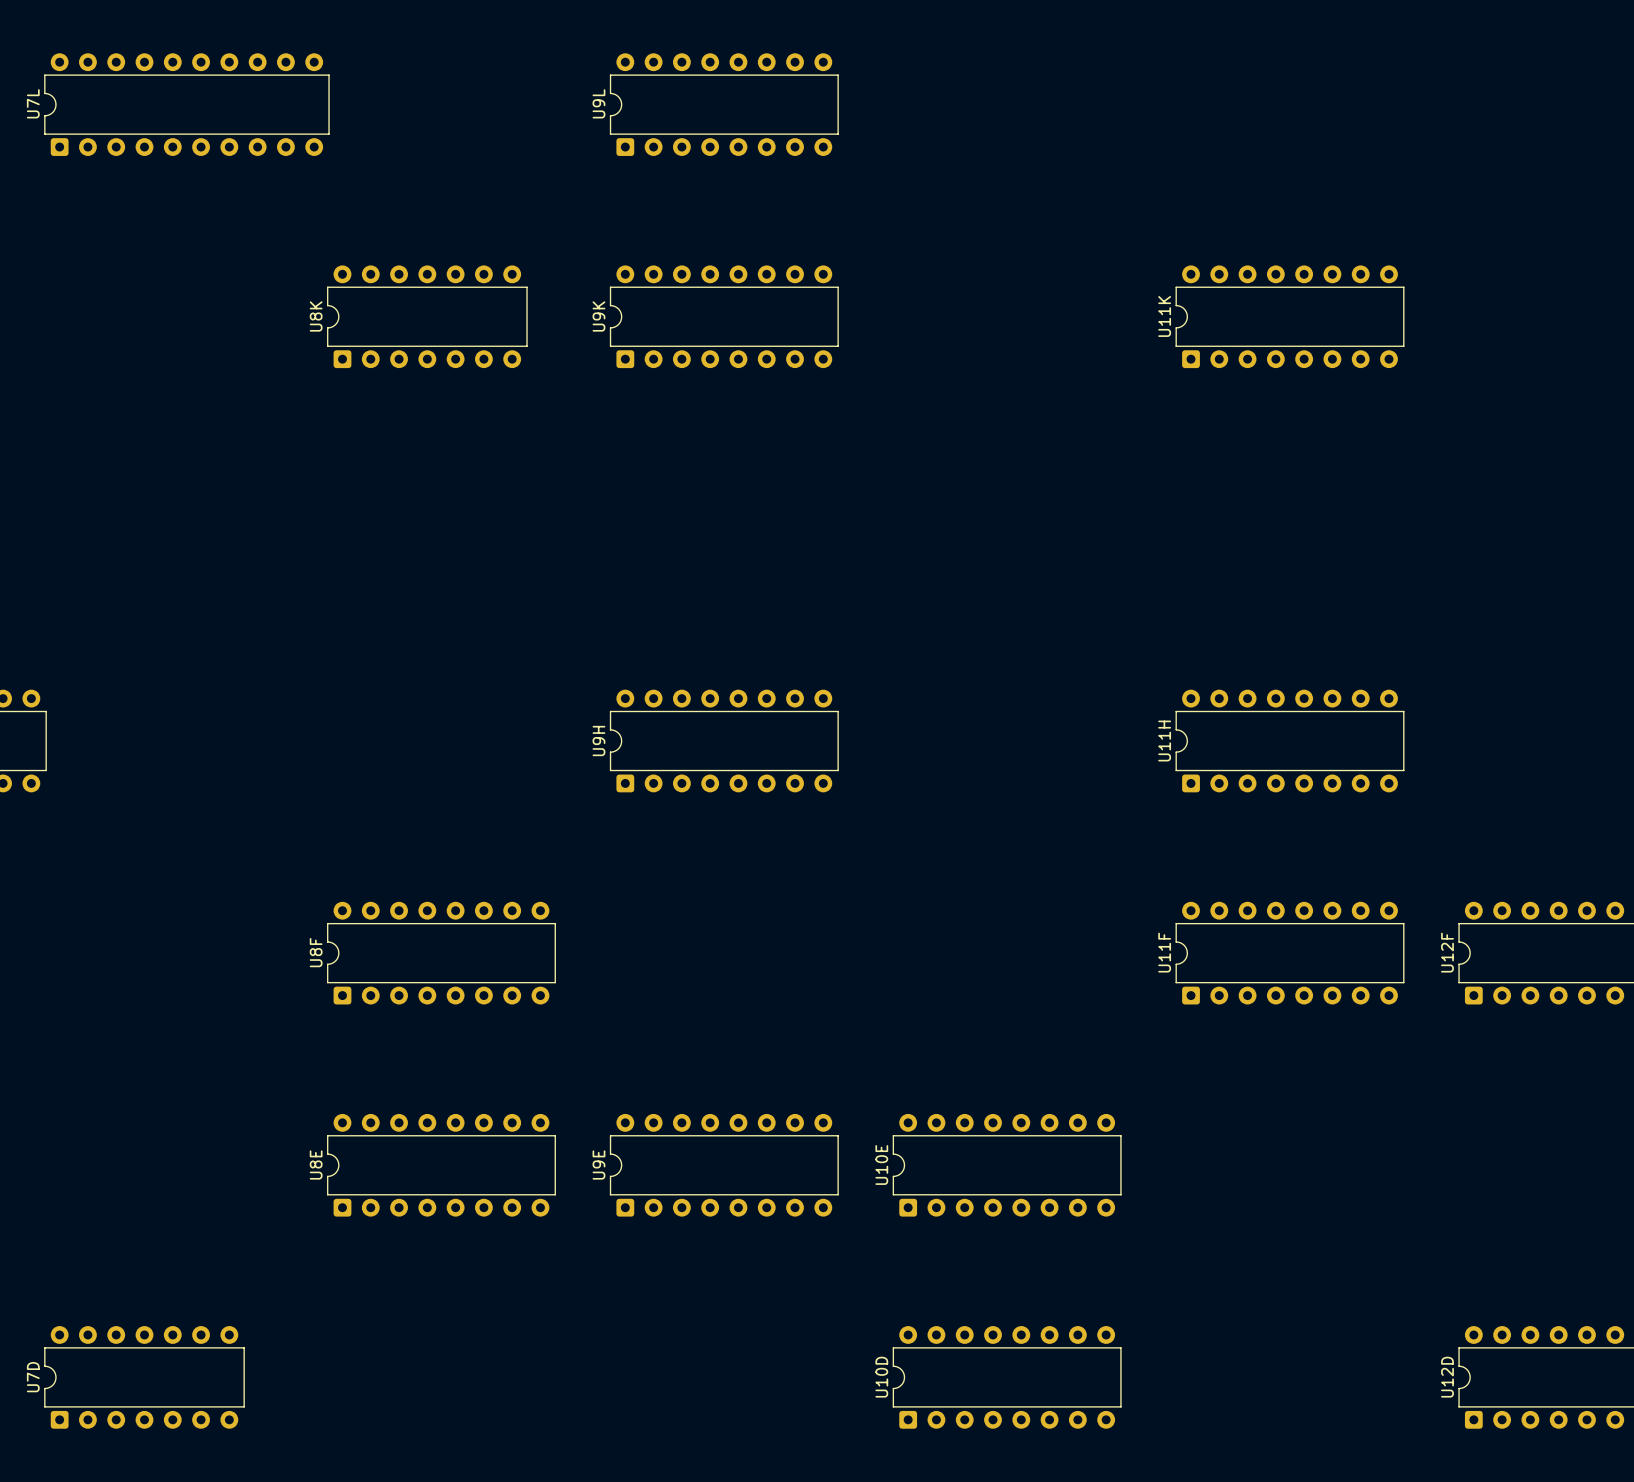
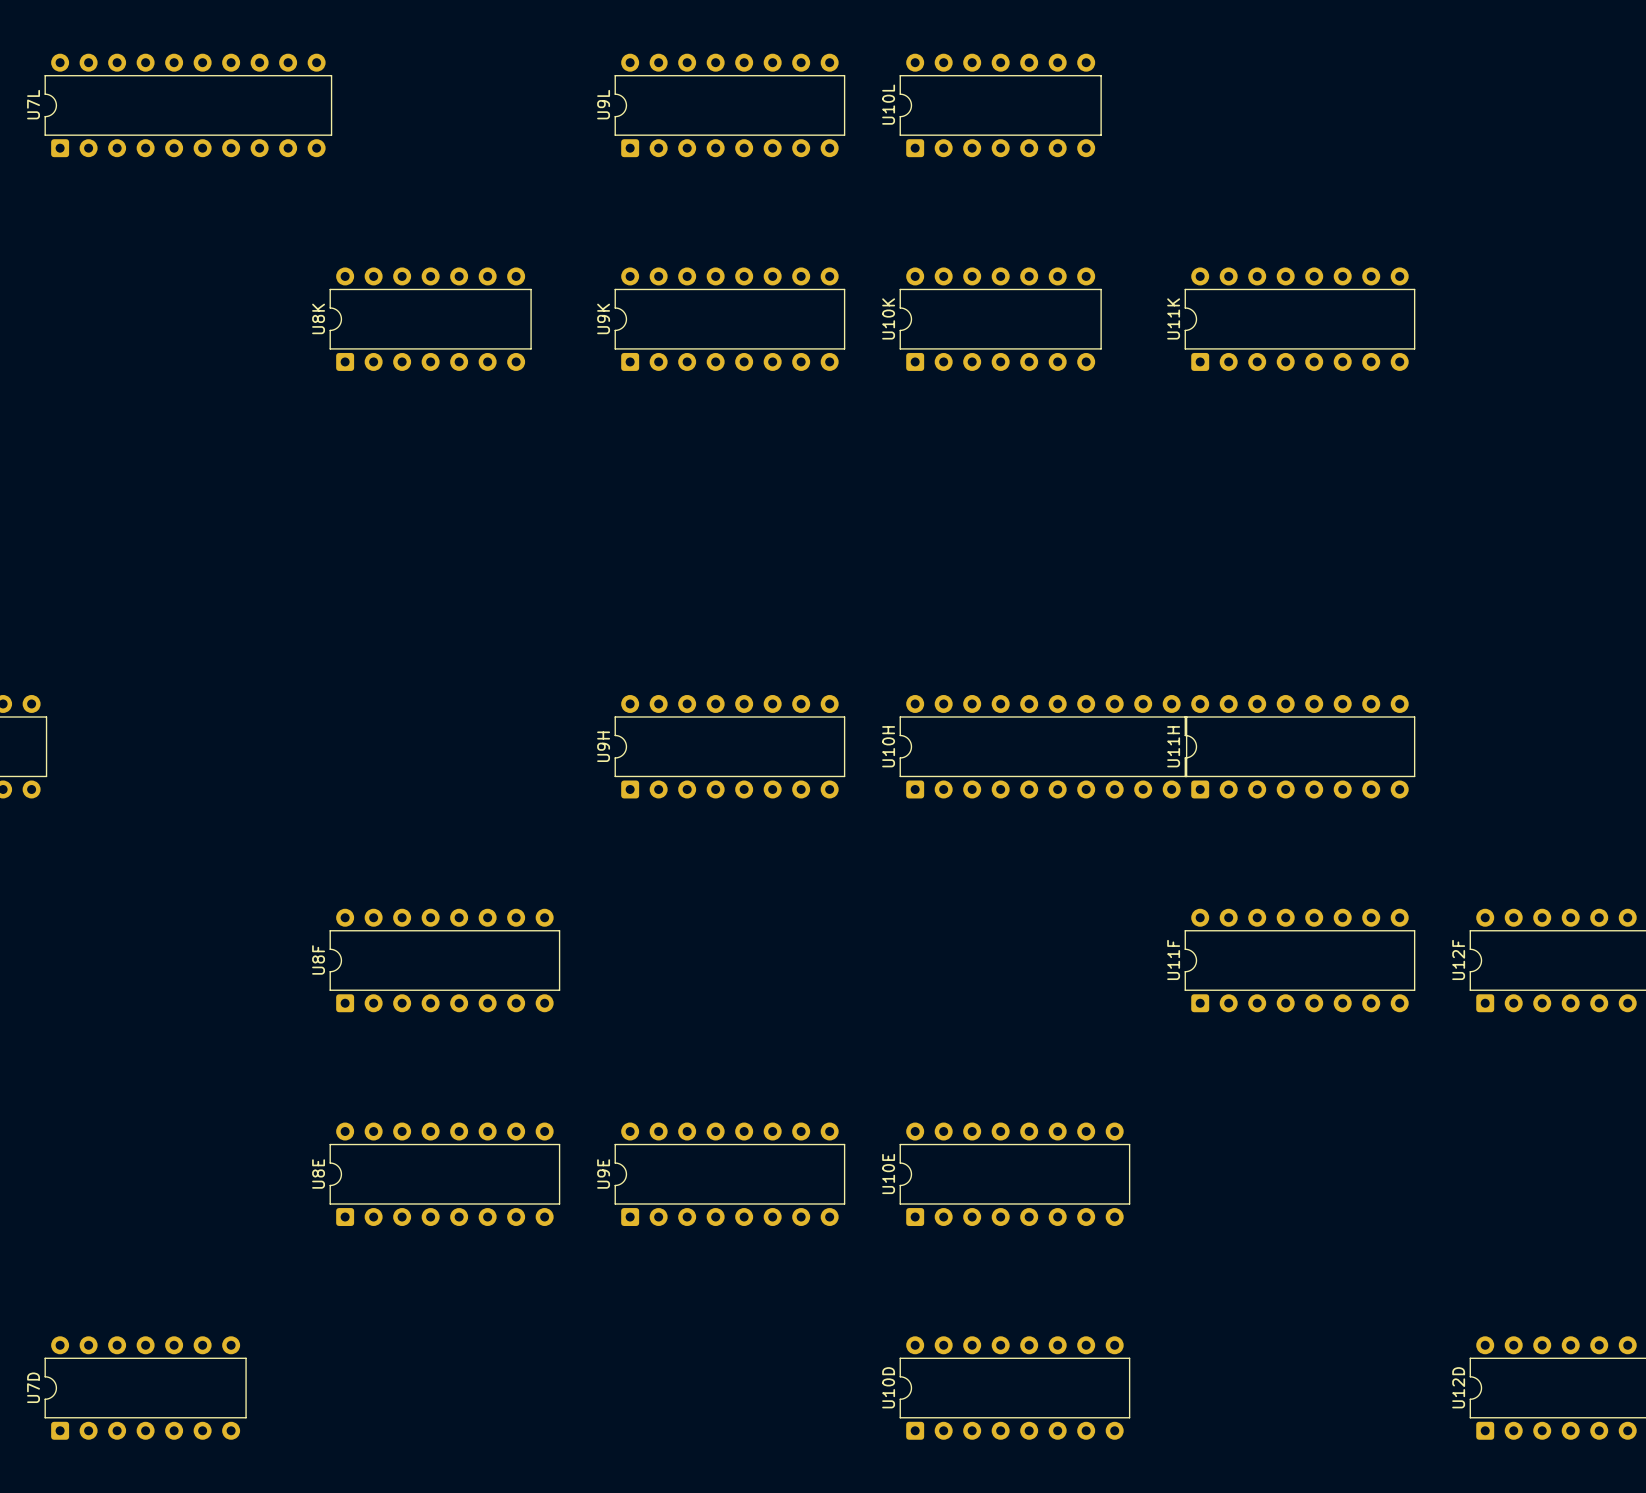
U10L: none -> (1000, 105)
U10K: none -> (1000, 319)
U10H: none -> (1043, 746)

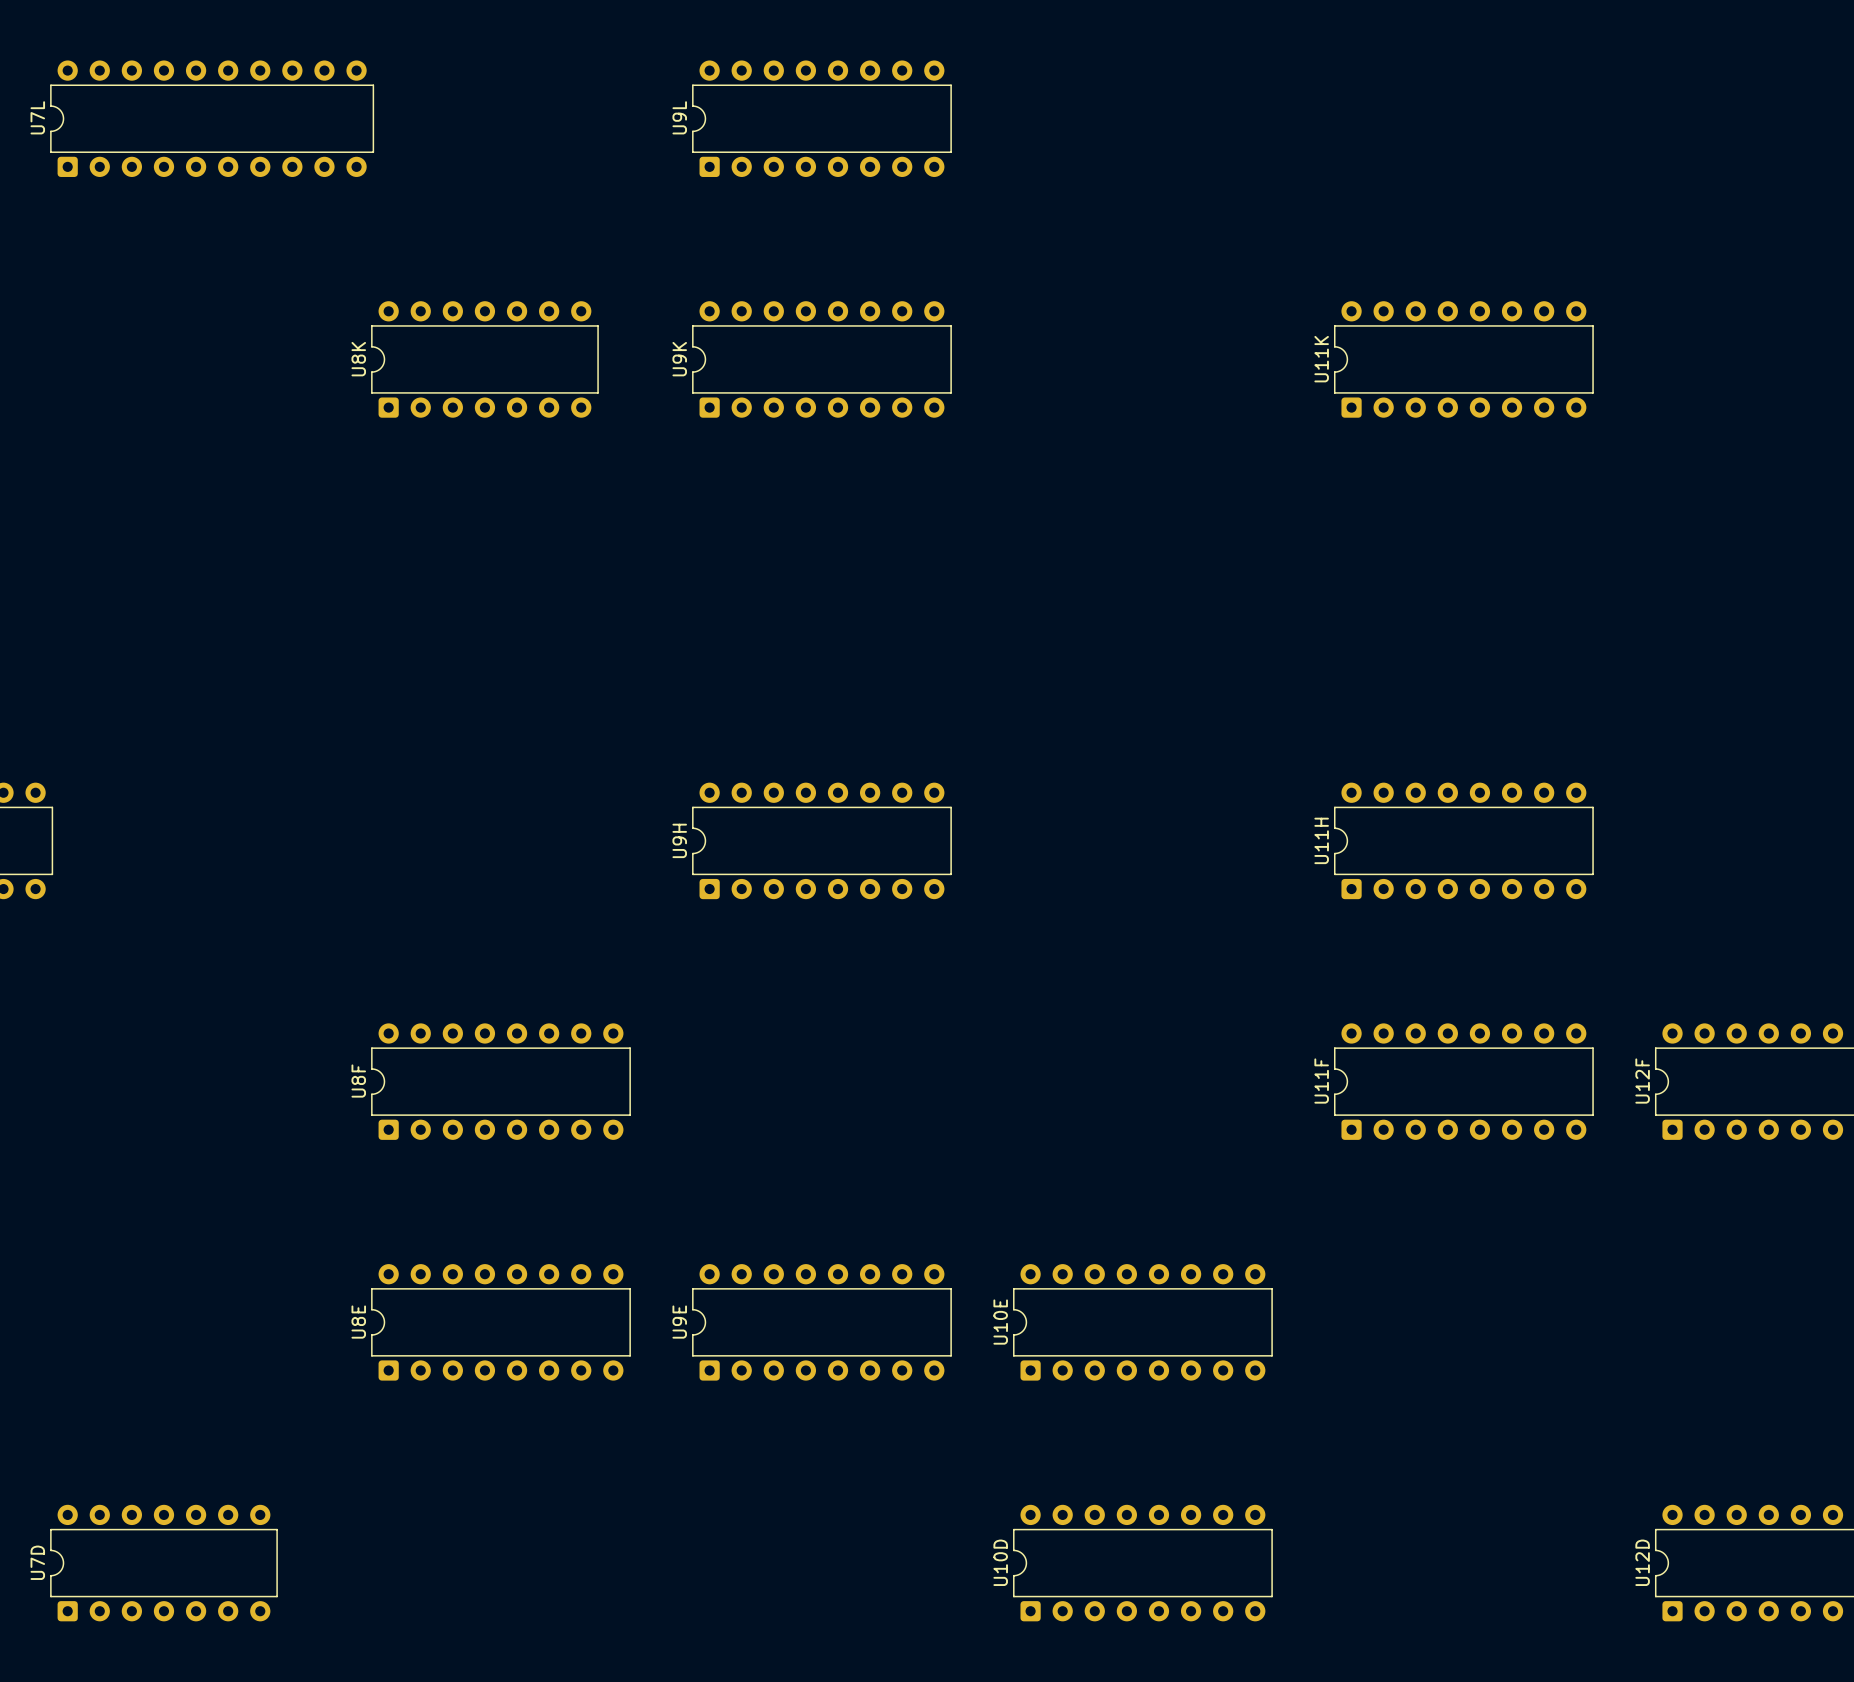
U10L: (1000, 105) -> none
U10K: (1000, 319) -> none
U10H: (1043, 746) -> none

